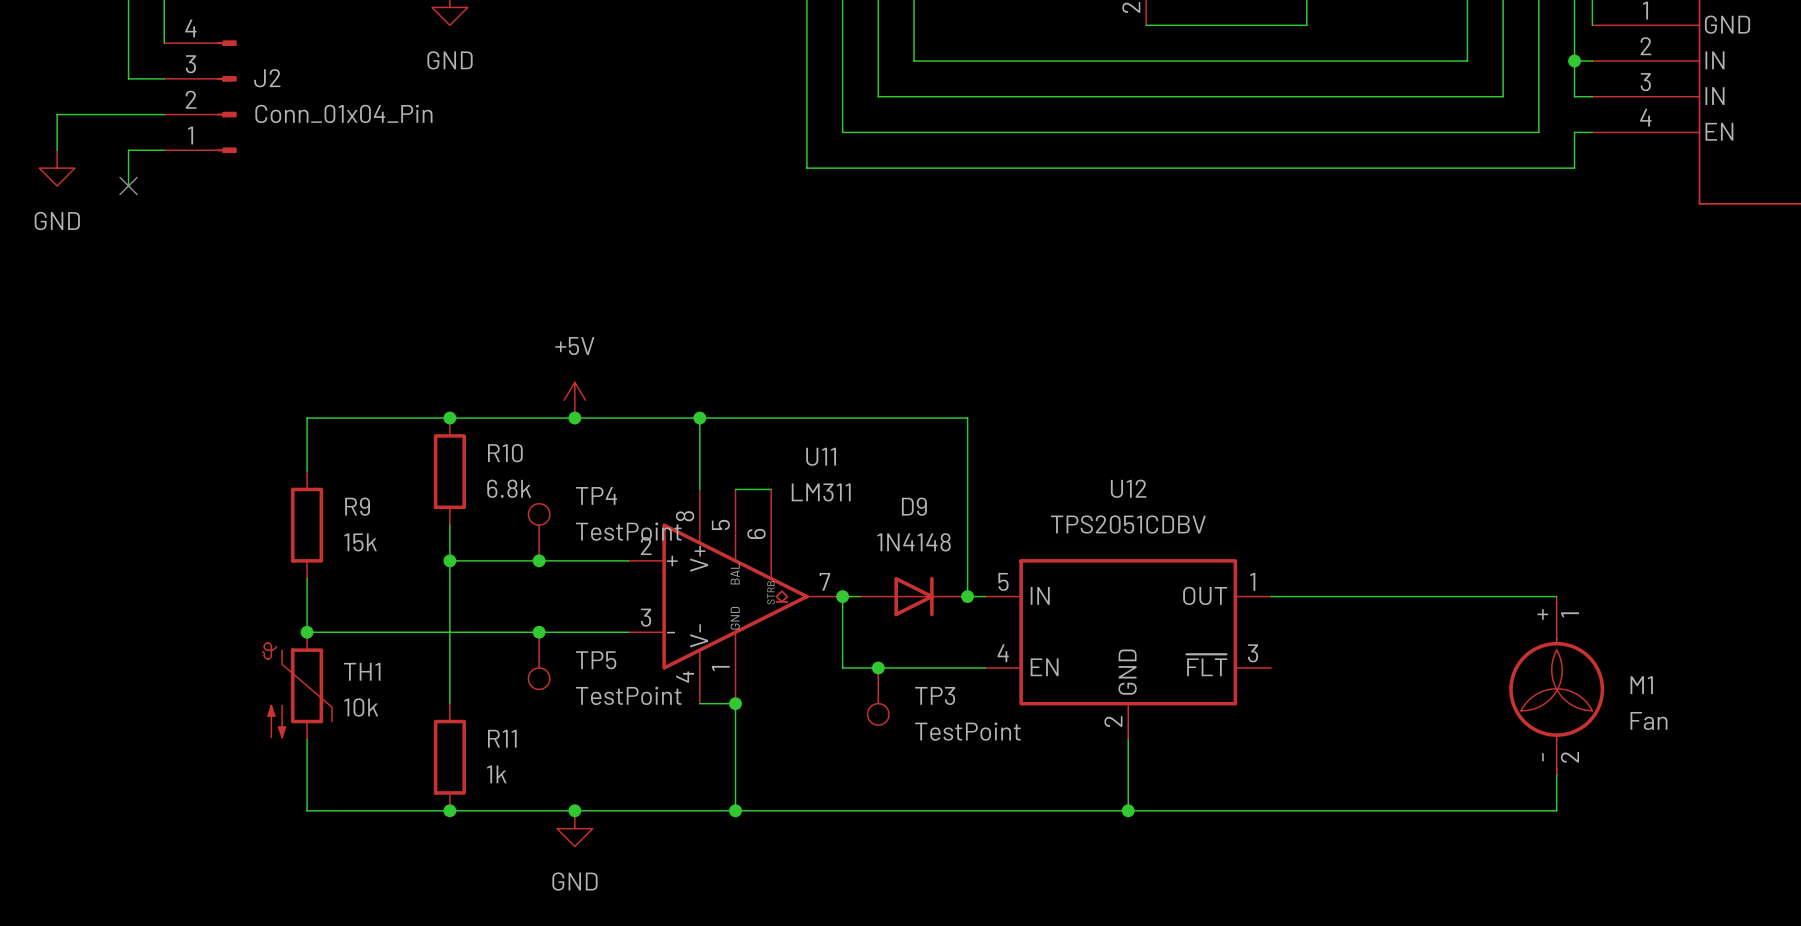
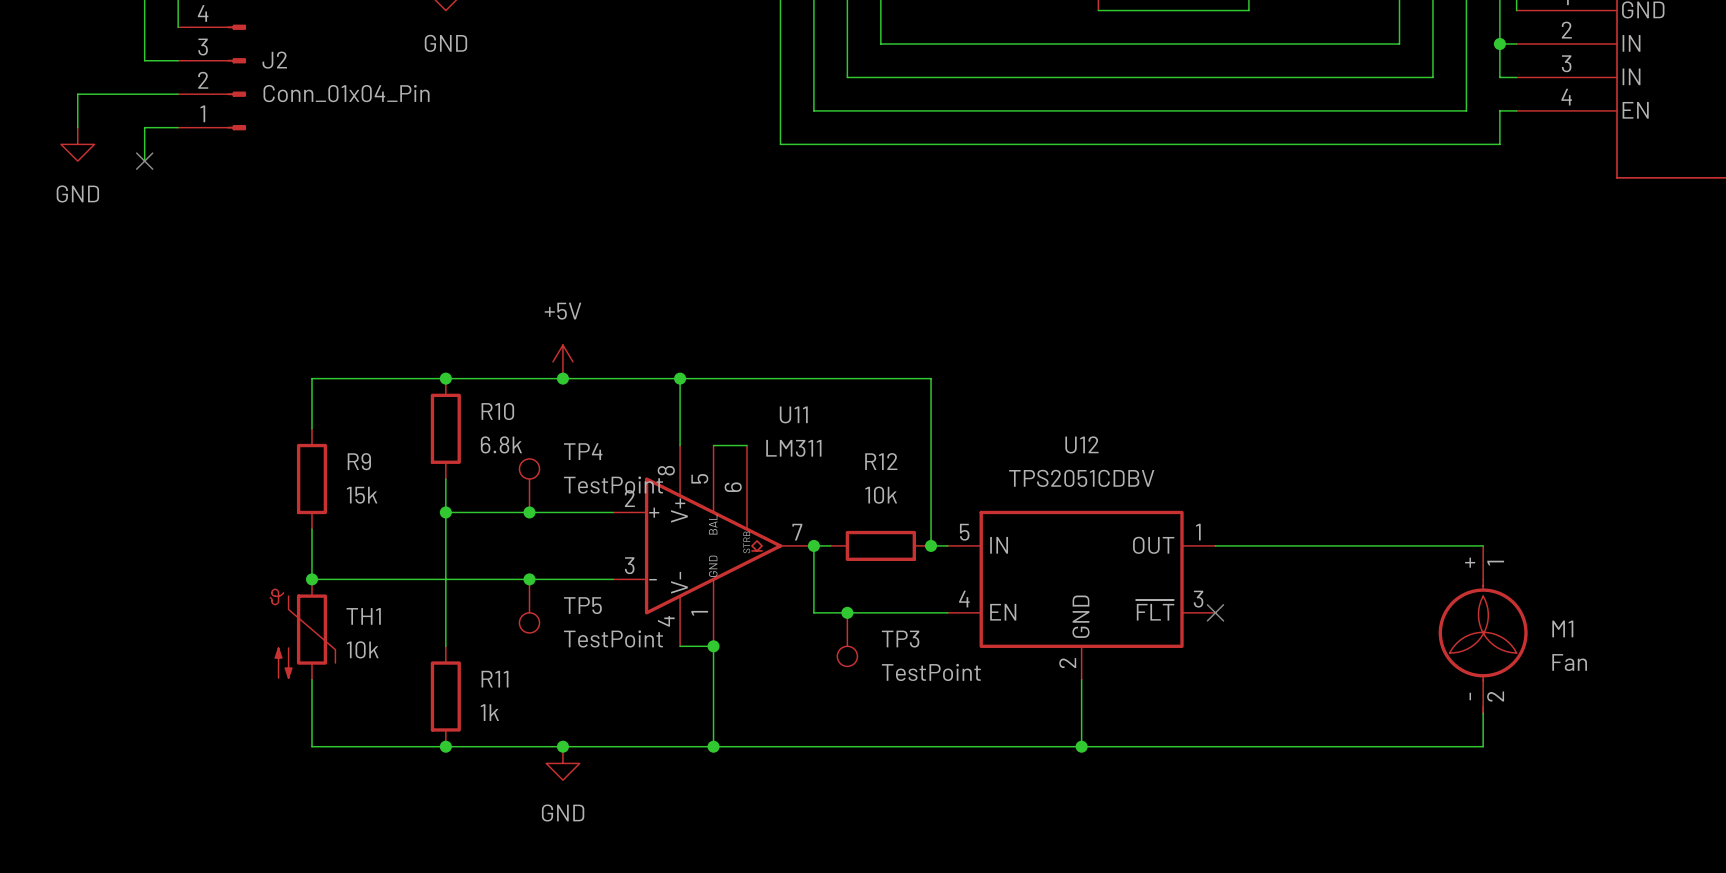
D9: 1N4148 (914, 596) -> none
R12: none -> 10k (880, 545)
no-connect mark: none -> (1215, 612)

